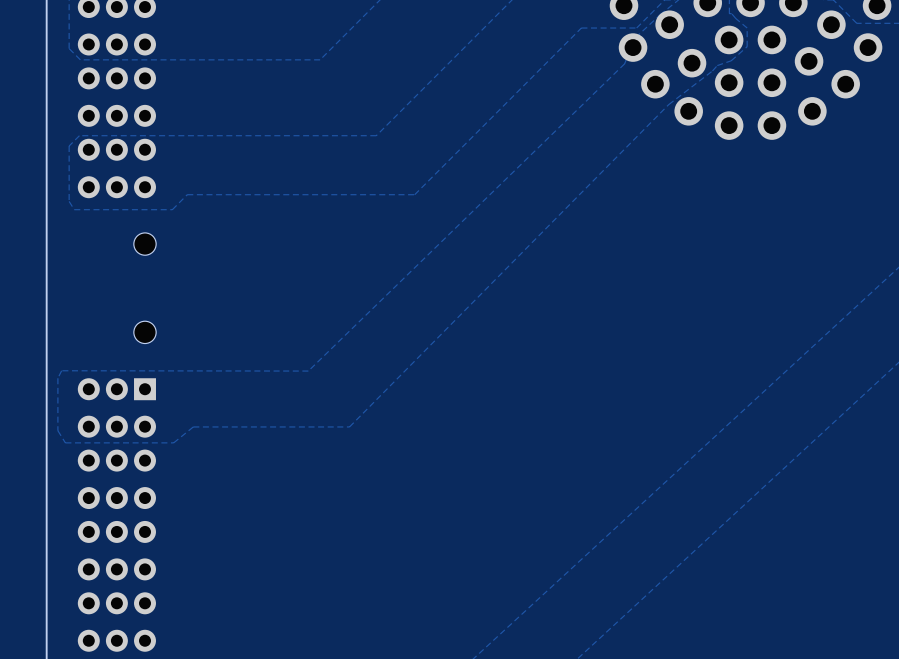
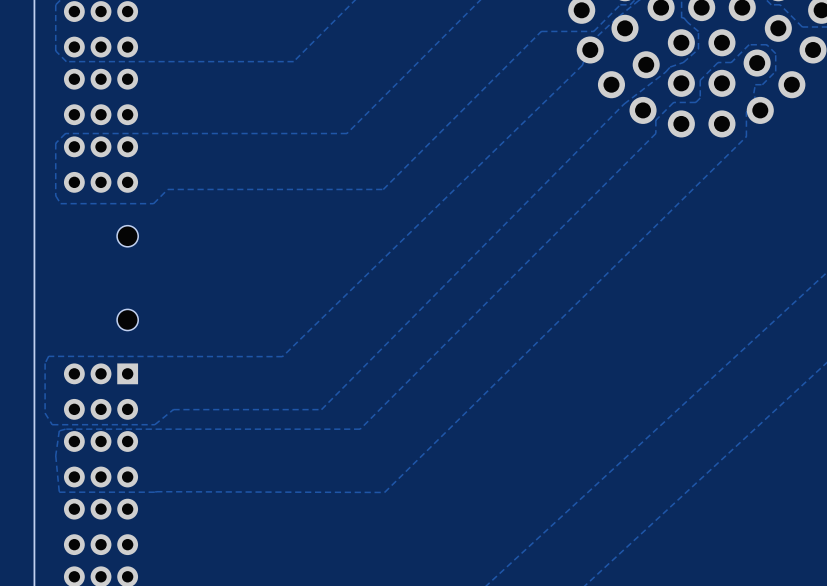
zone outline: none -> (766, 44) (775, 53) (775, 71) (762, 84) (755, 84) (753, 93) (756, 102) (746, 112) (746, 136) (384, 492) (59, 492) (55, 455) (59, 430) (65, 429) (360, 429) (655, 133) (655, 120) (673, 102) (695, 102) (700, 98) (700, 80) (718, 62) (731, 62) (749, 44) (766, 44)

